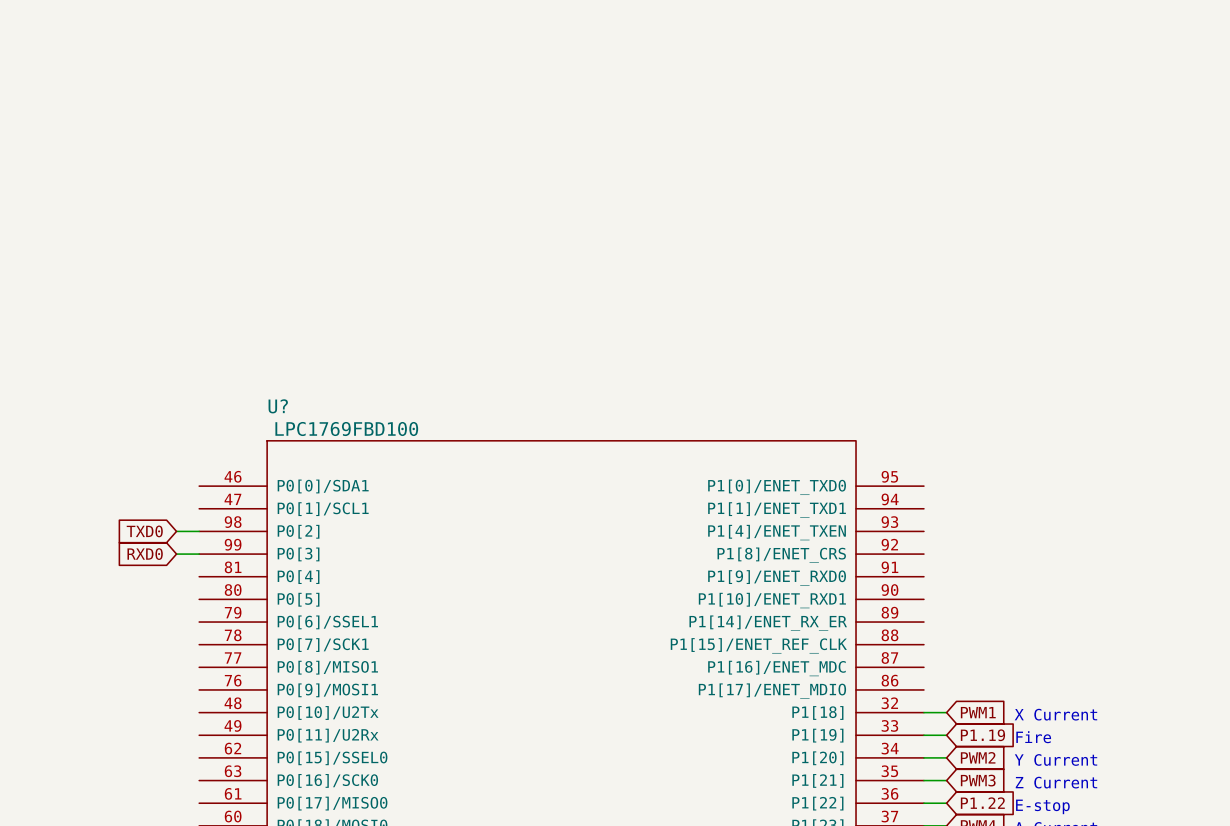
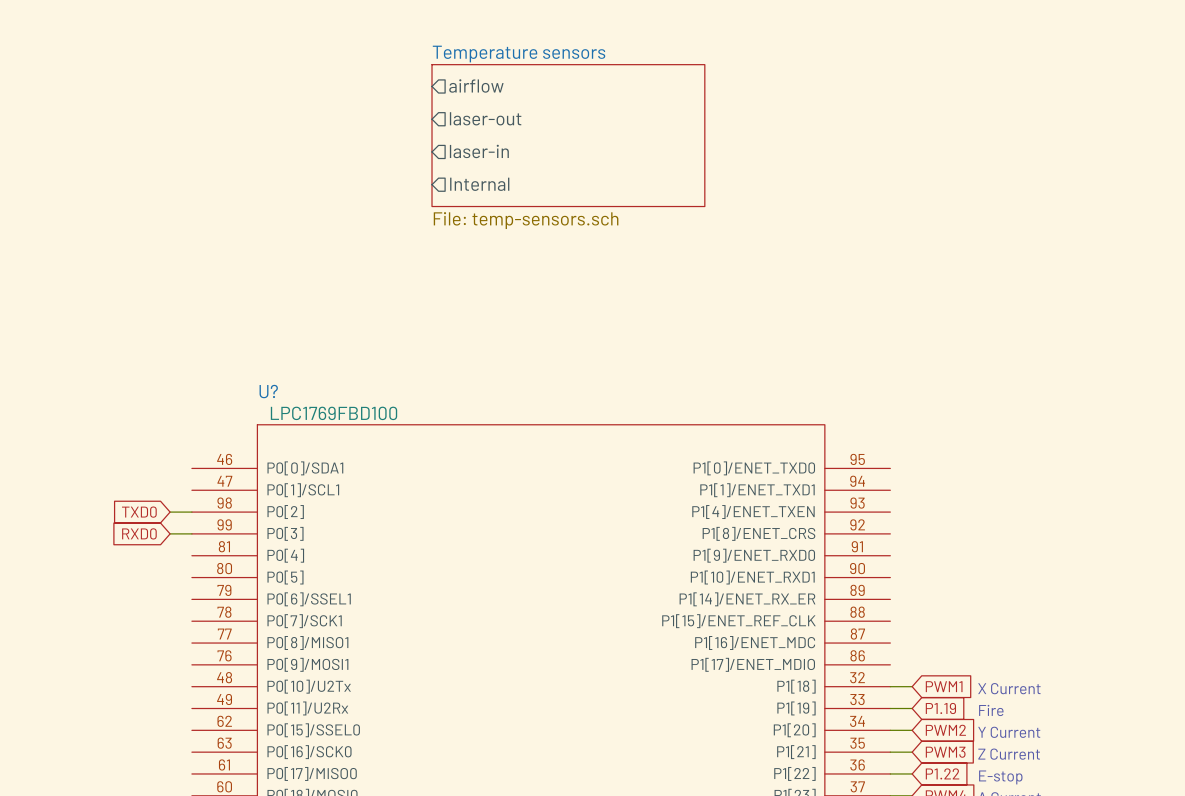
sheet pin: none -> airflow (476, 85)
sheet pin: none -> laser-out (485, 118)
sheet Temperature sensors: none -> File: temp-sensors.sch (568, 135)
sheet pin: none -> laser-in (479, 151)
sheet pin: none -> Internal (479, 184)

